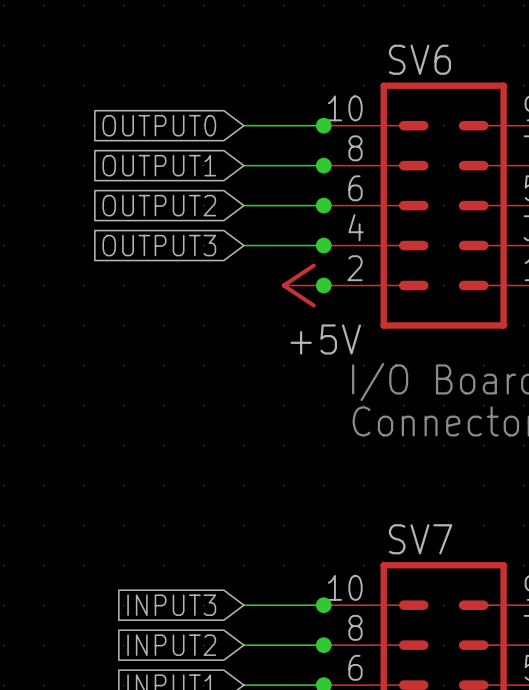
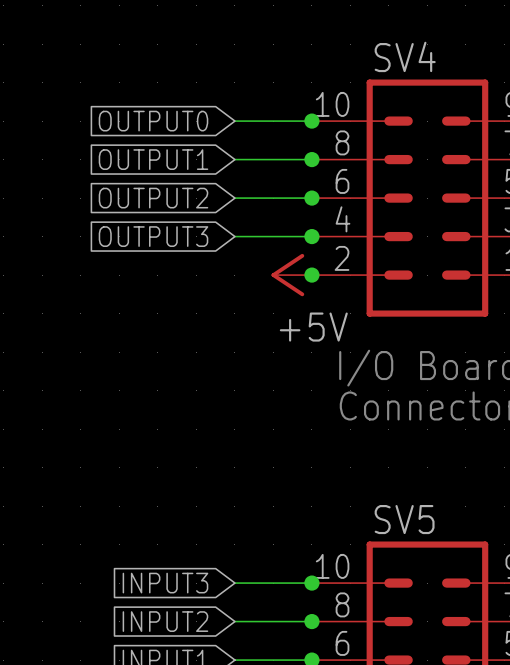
SV6 name: SV6 (419, 59) -> SV4 (405, 56)
SV7 name: SV7 (420, 539) -> SV5 (404, 519)

